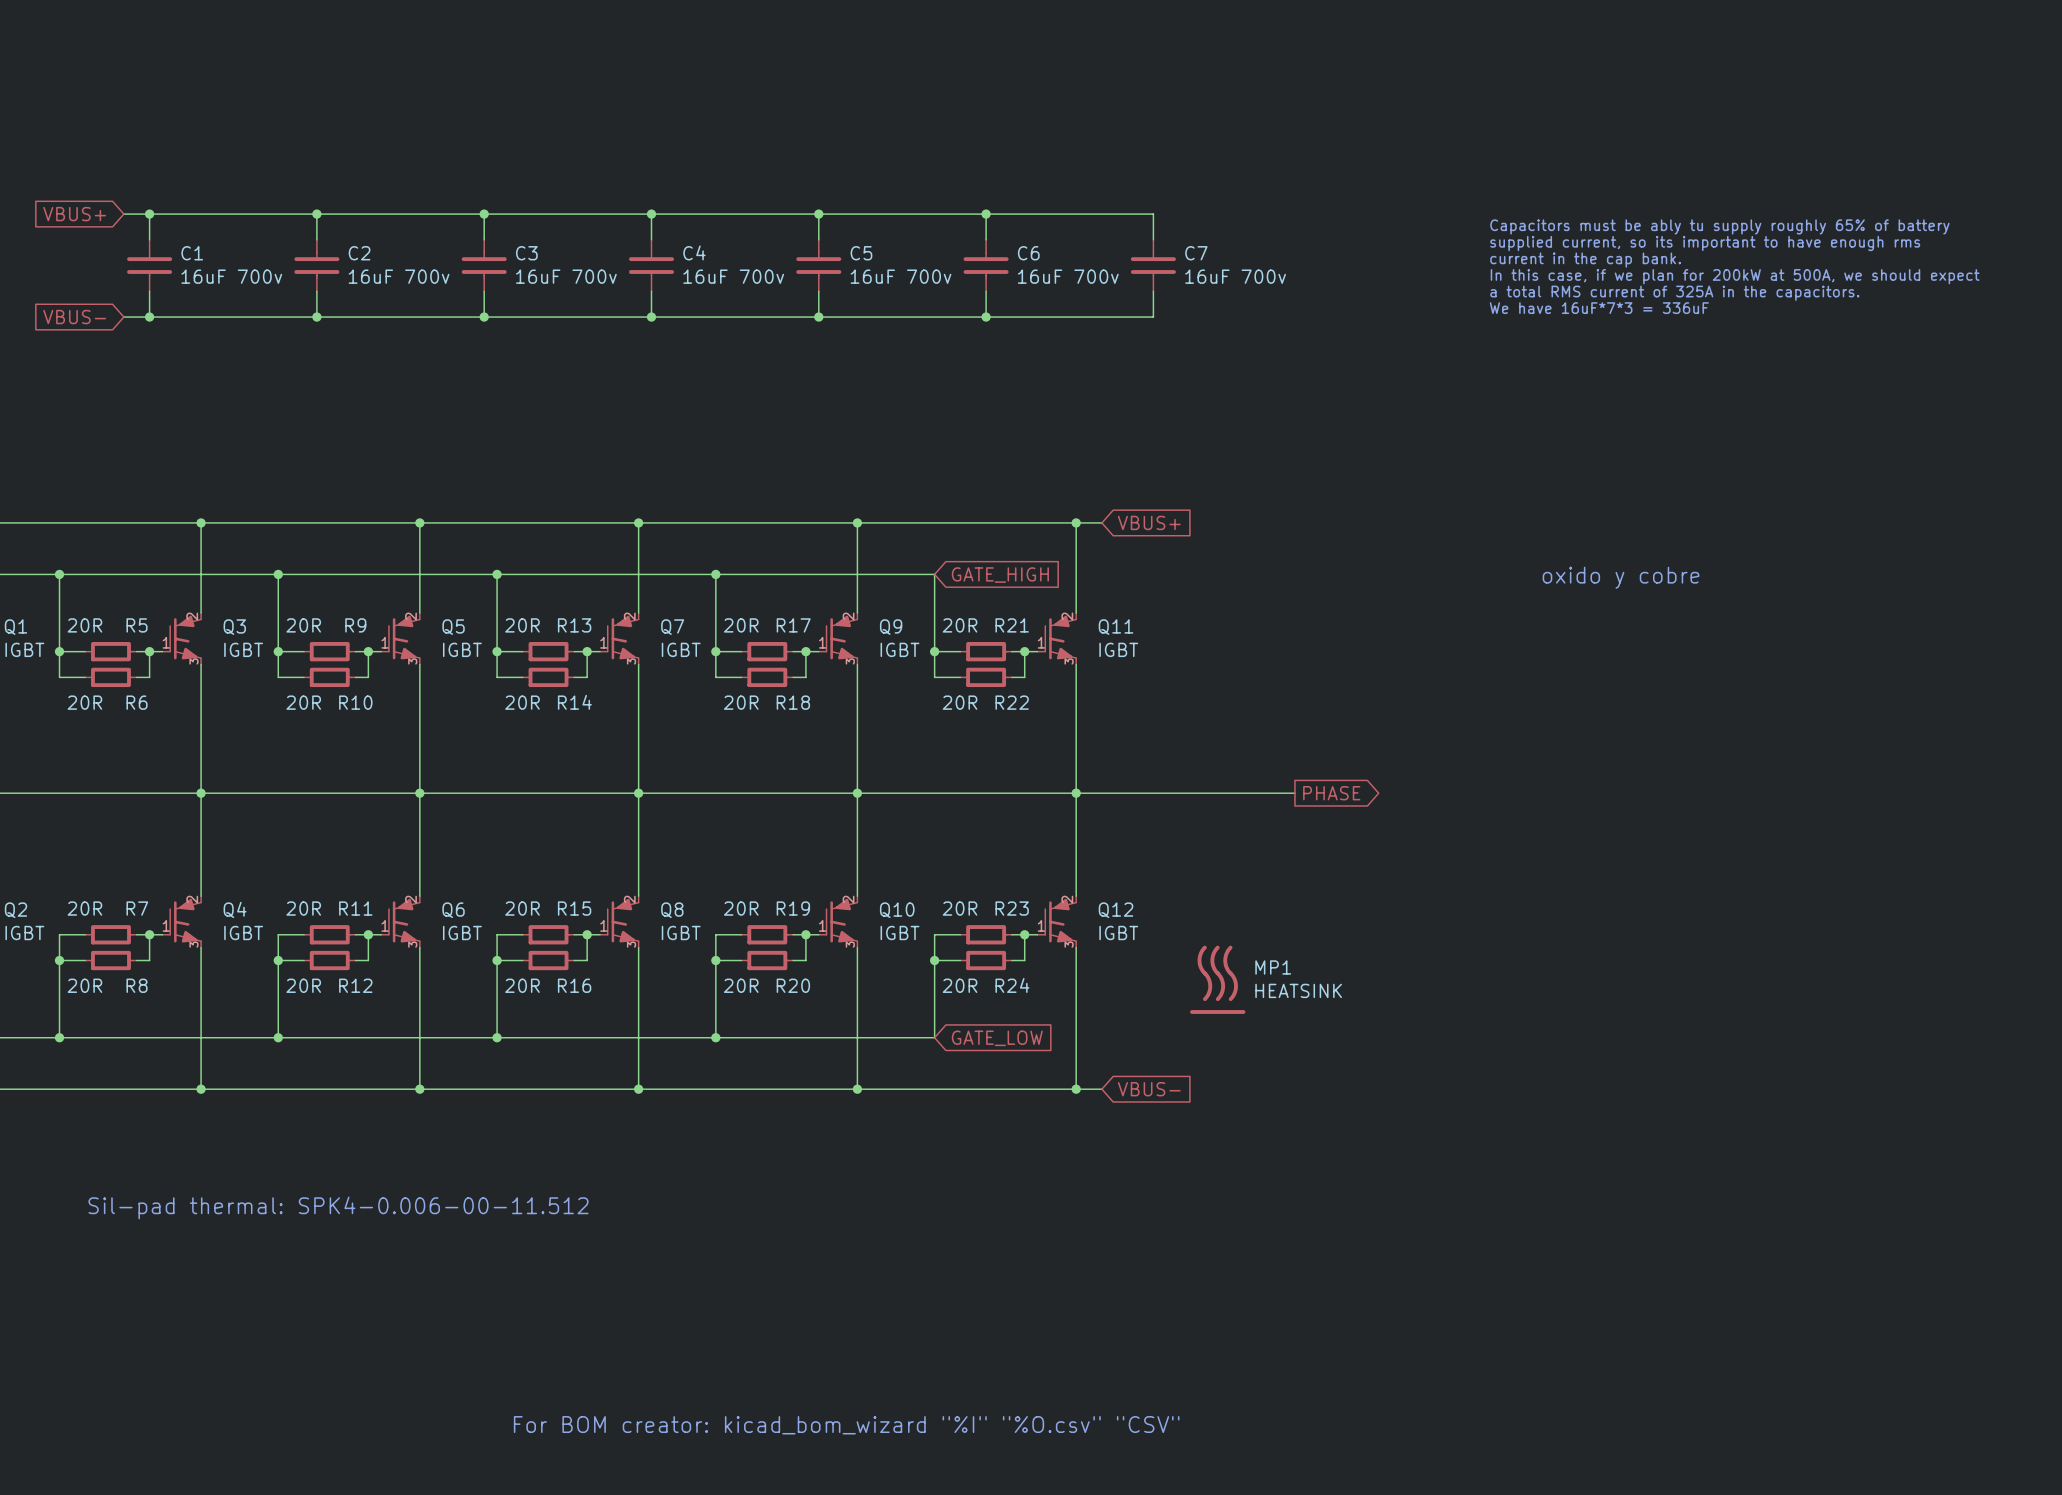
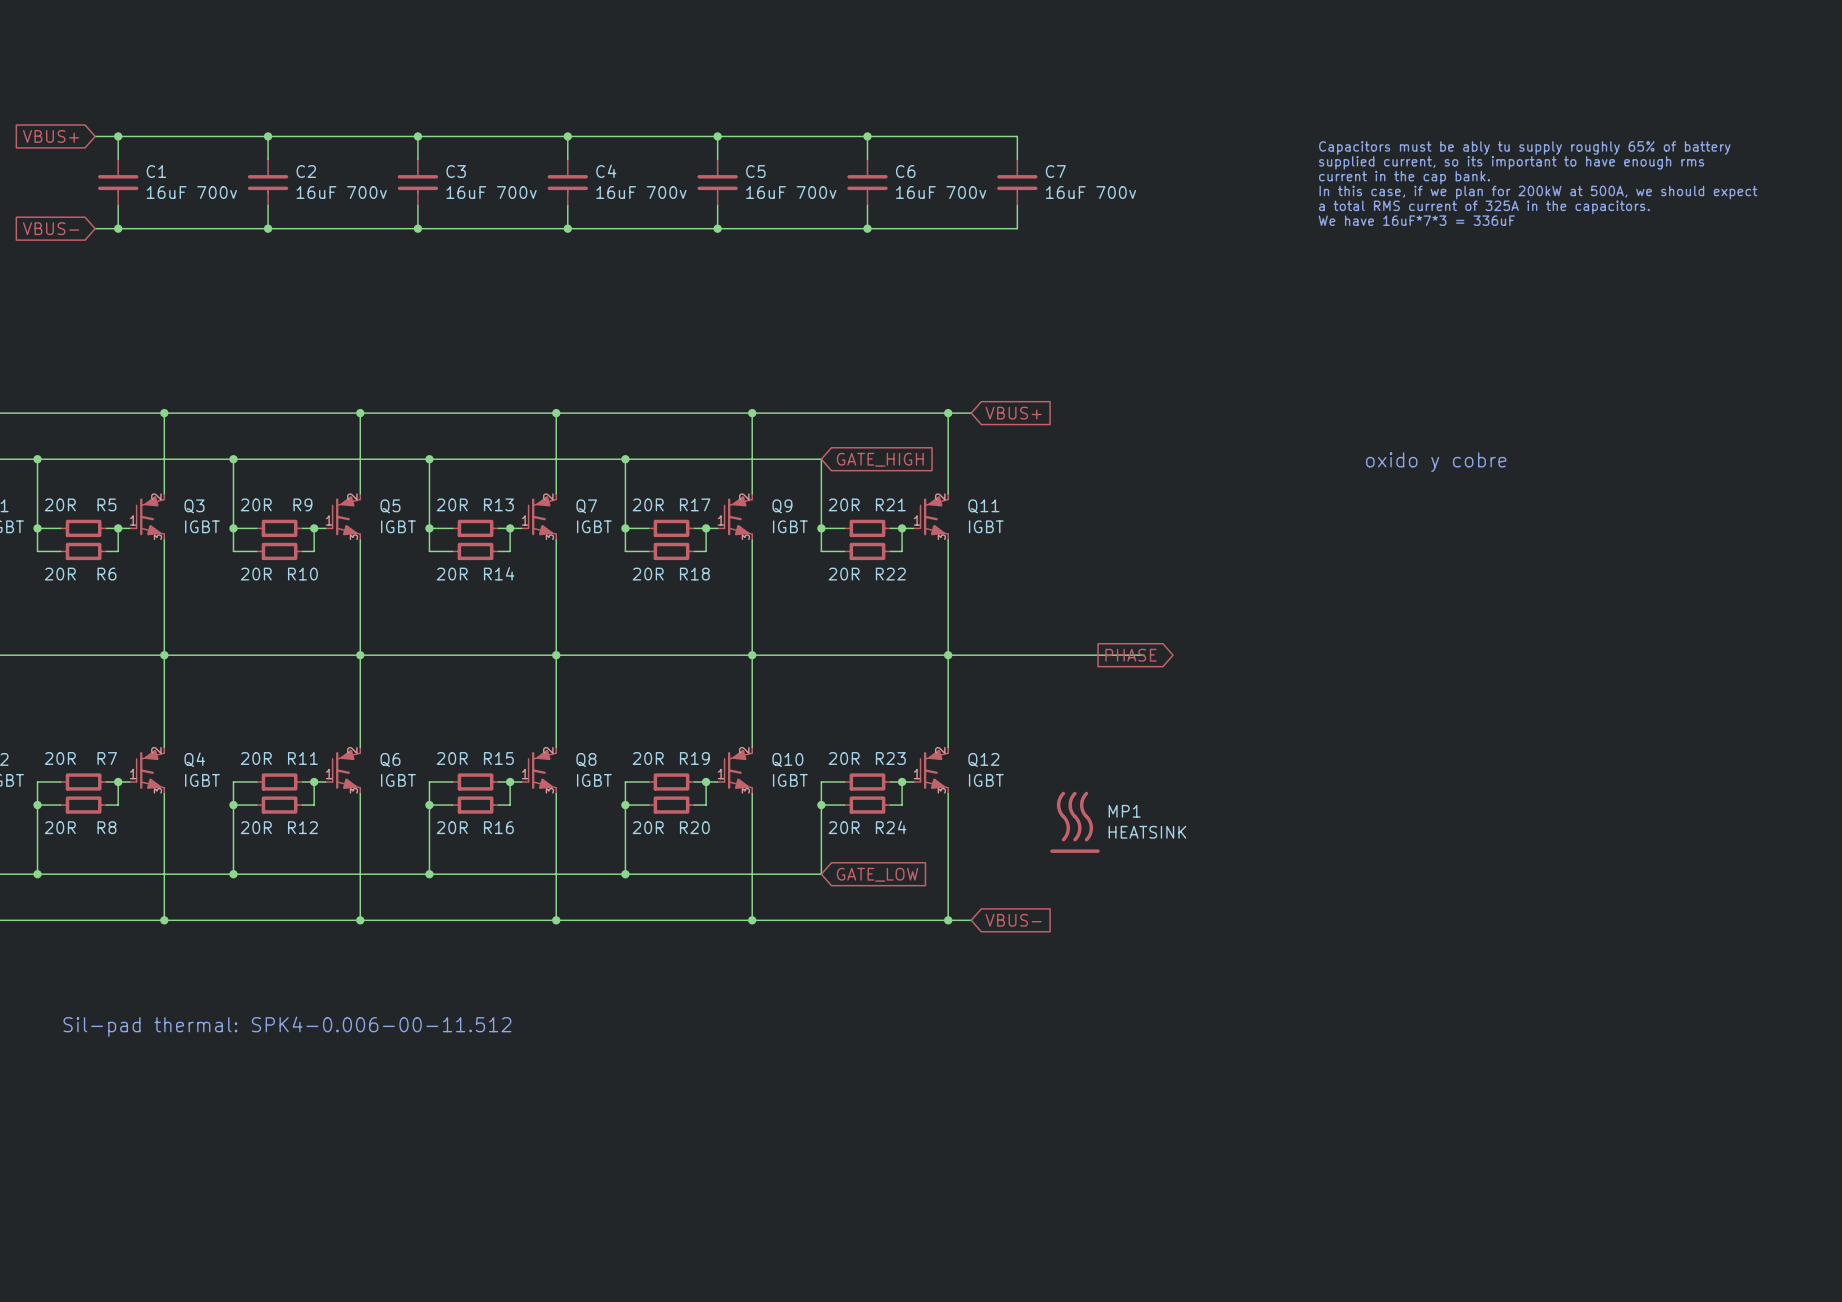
global label position: PHASE (1331, 793) -> PHASE (1130, 655)
text: For BOM creator: kicad_bom_wizard "%I" "%O.csv" "CSV" (846, 1425) -> none

